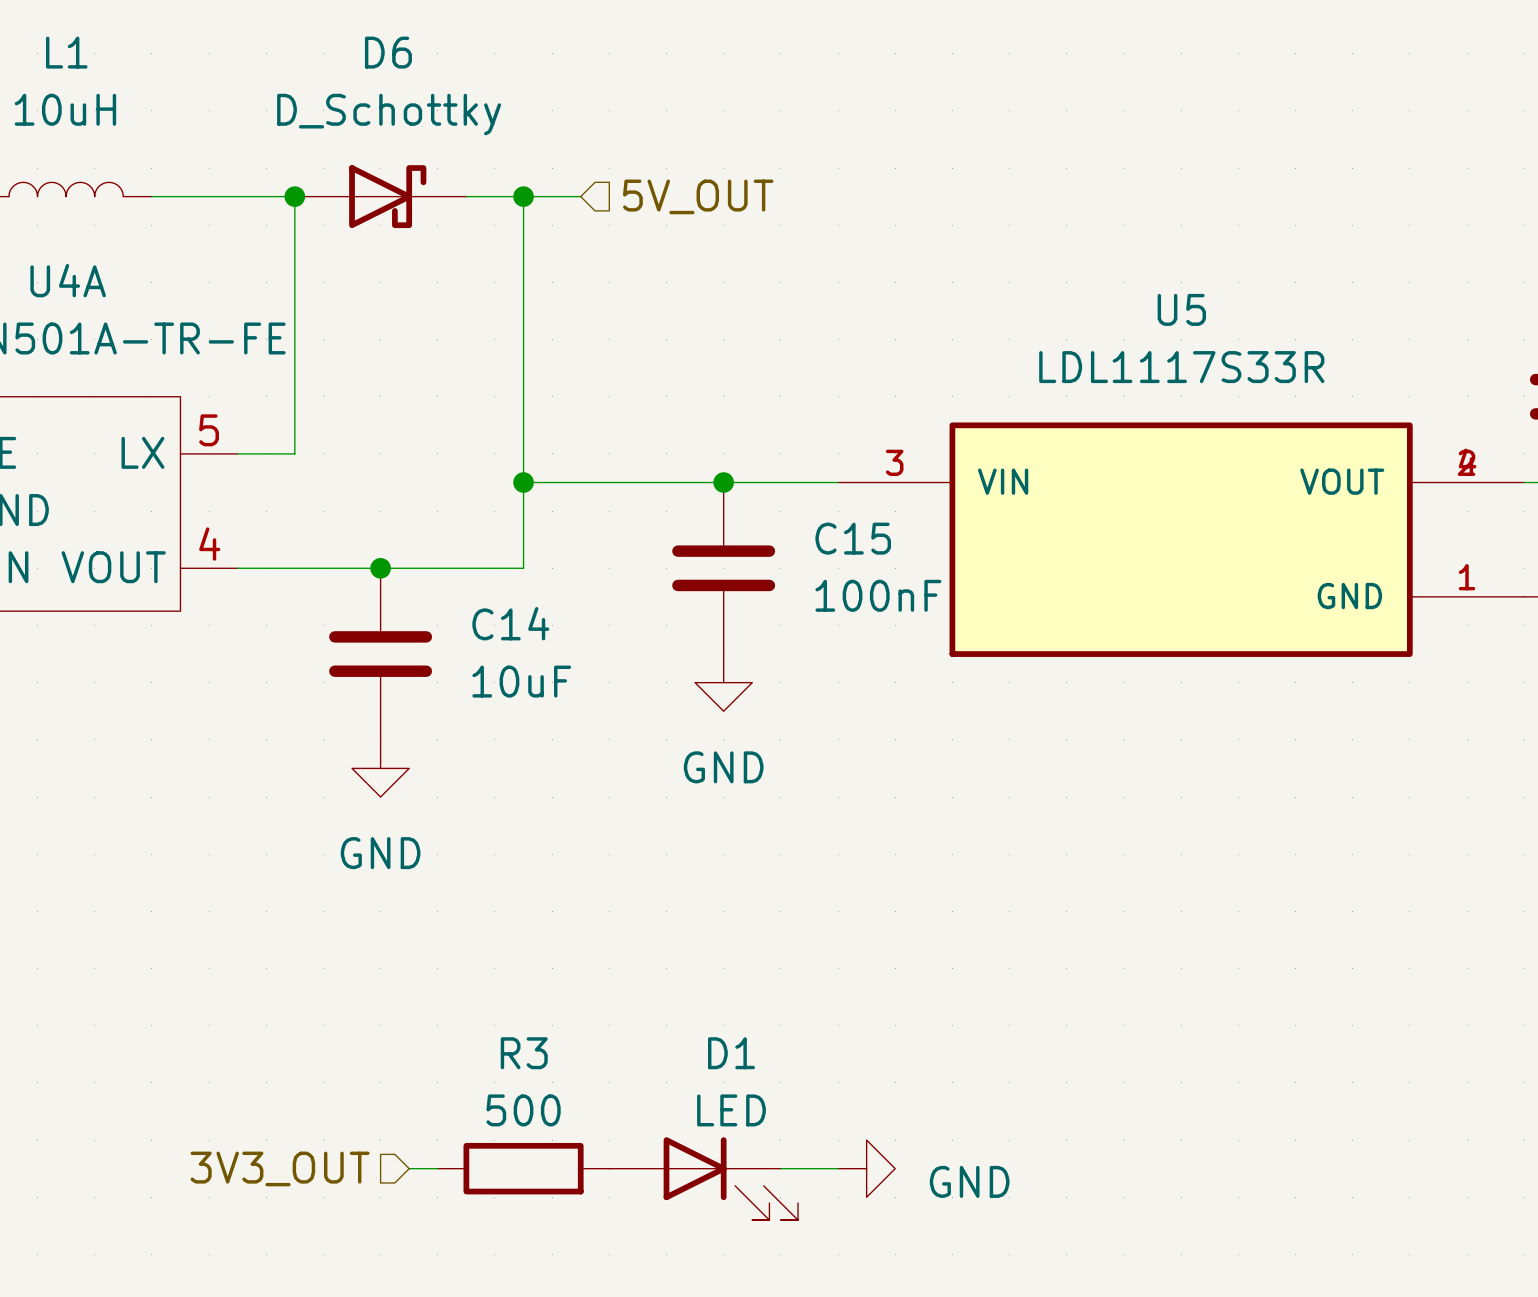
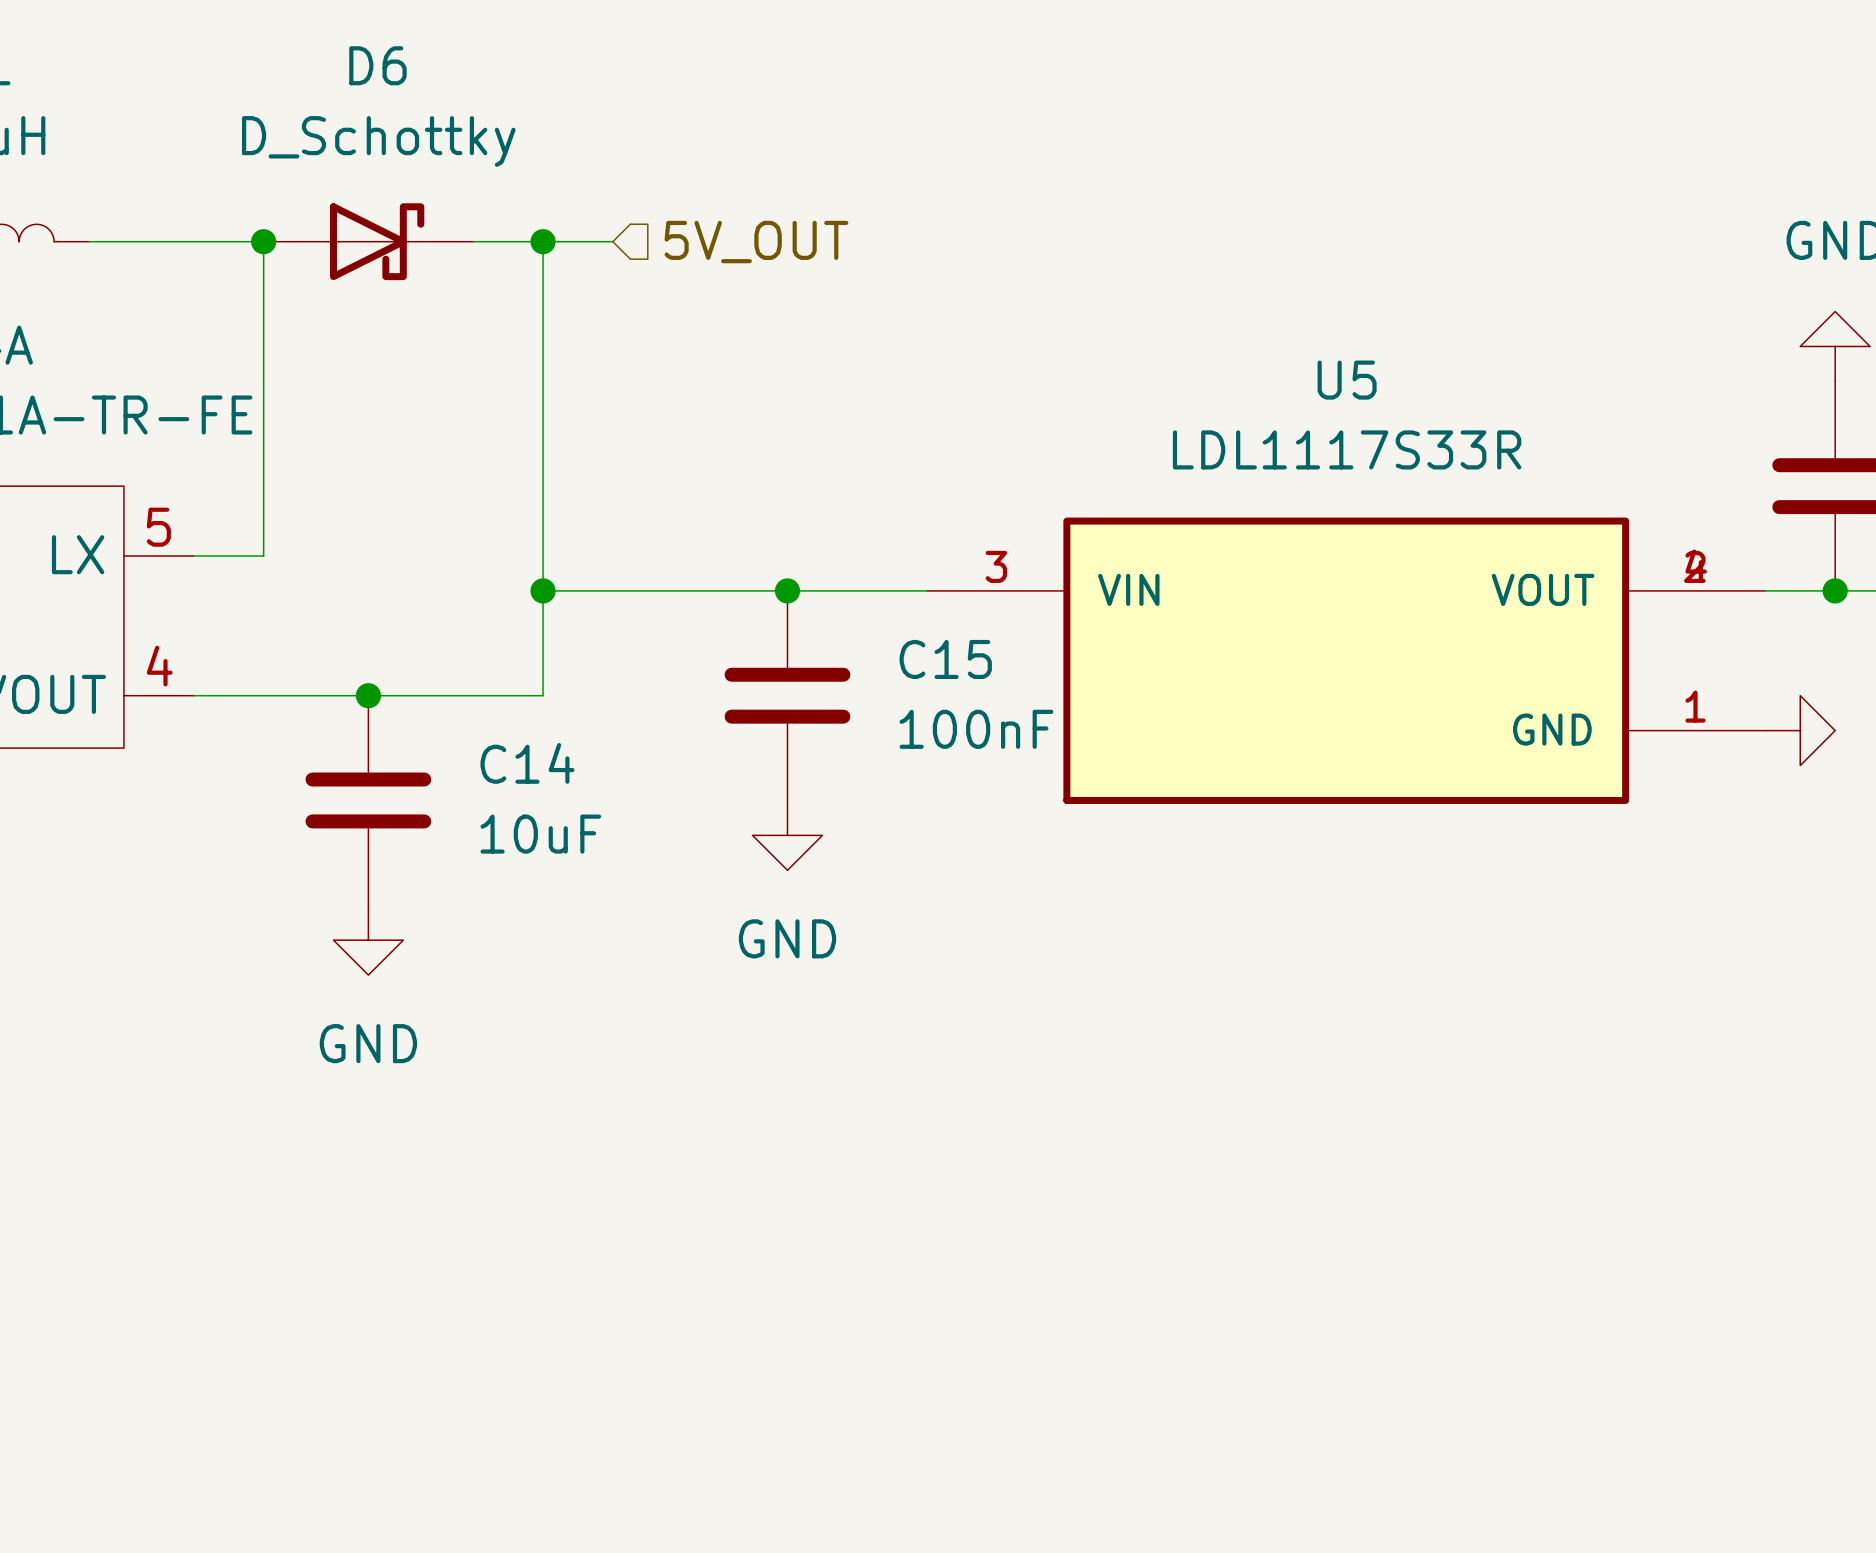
hierarchical label: 3V3_OUT (280, 1168) -> none
wire: (409, 1168) (437, 1168) -> none
R3: 500 (523, 1168) -> none
wire: (780, 1168) (838, 1168) -> none
power symbol: GND (866, 1168) -> none
D1: LED (703, 1178) -> none

